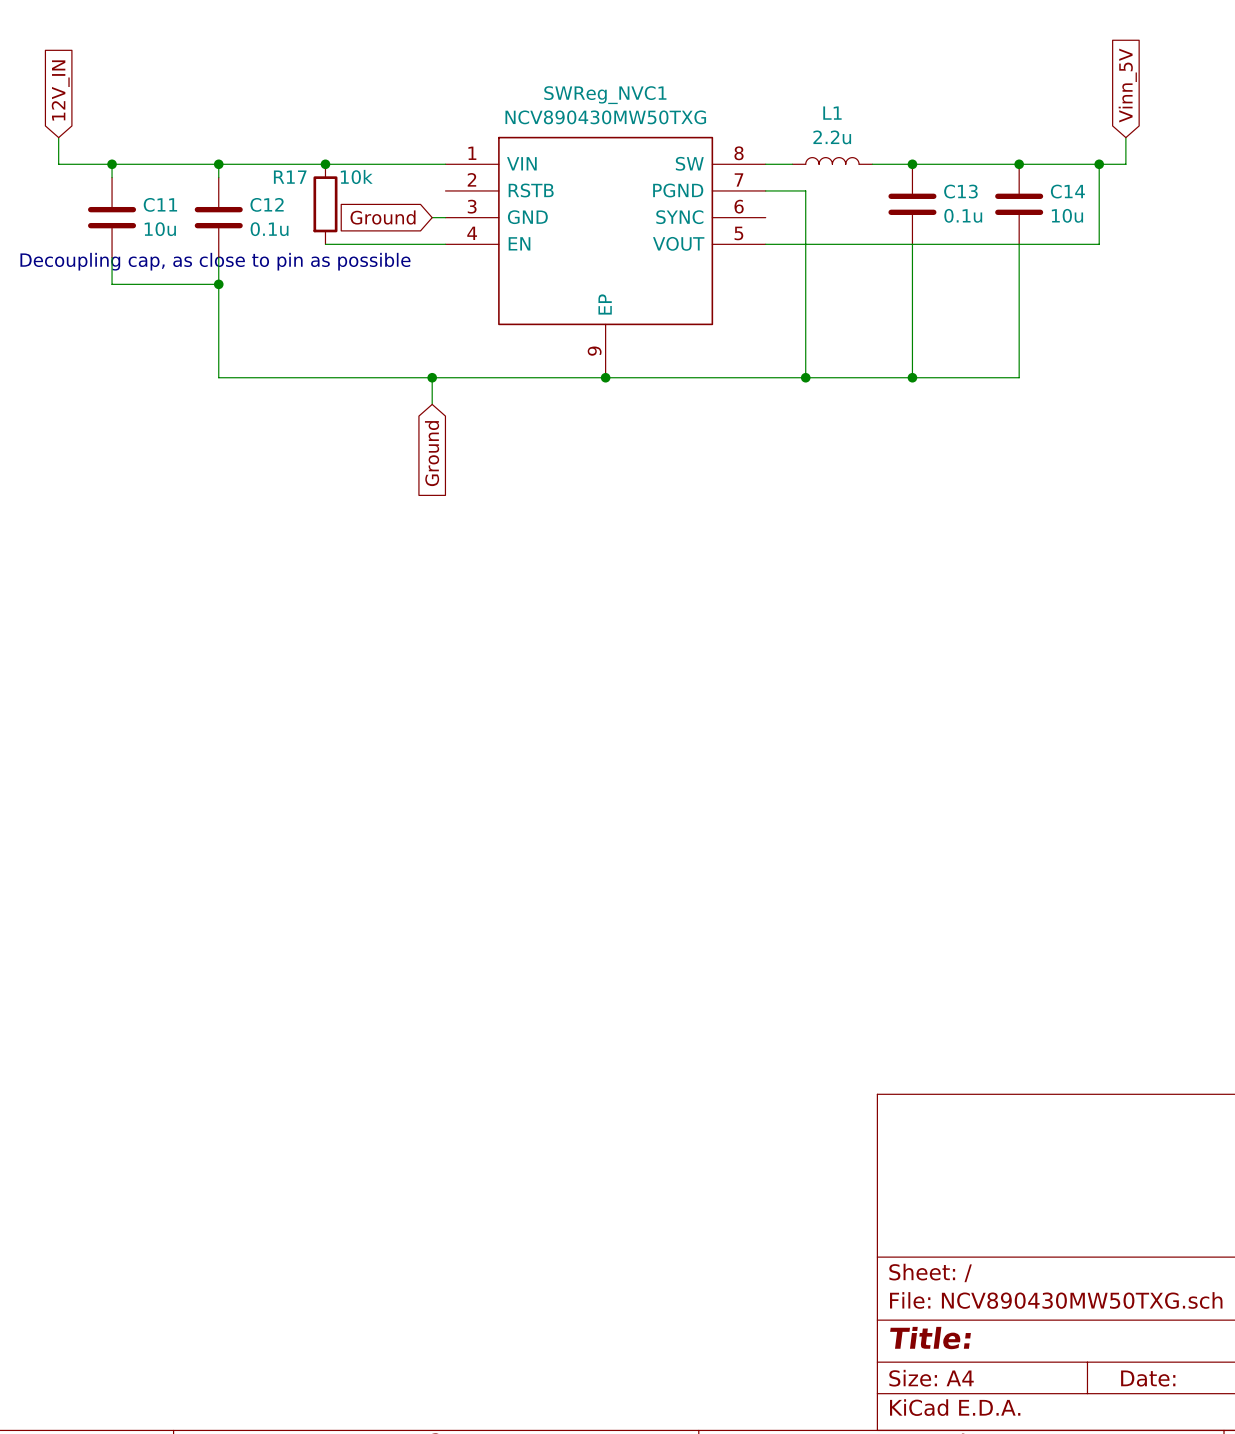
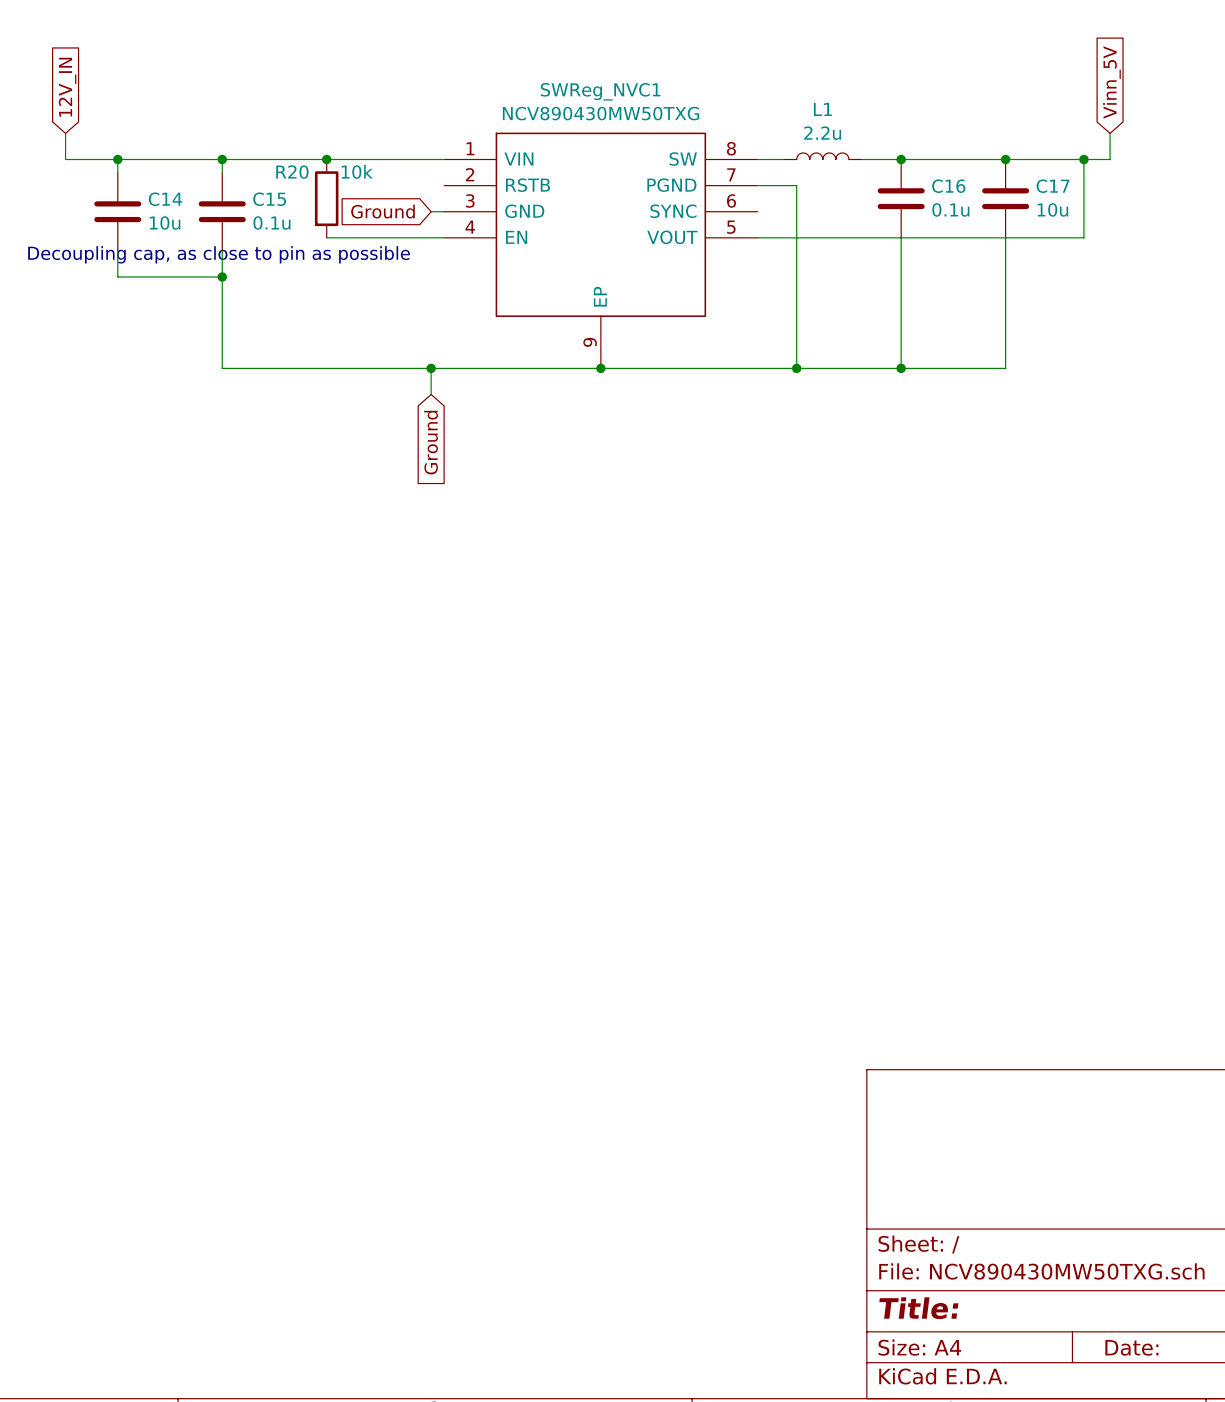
R17 name: R17 (290, 177) -> R20 (292, 172)
C13 name: C13 (960, 191) -> C16 (948, 186)
C14 name: C14 (1067, 191) -> C17 (1053, 186)
C11 name: C11 (160, 204) -> C14 (165, 199)
C12 name: C12 (267, 204) -> C15 (269, 199)

